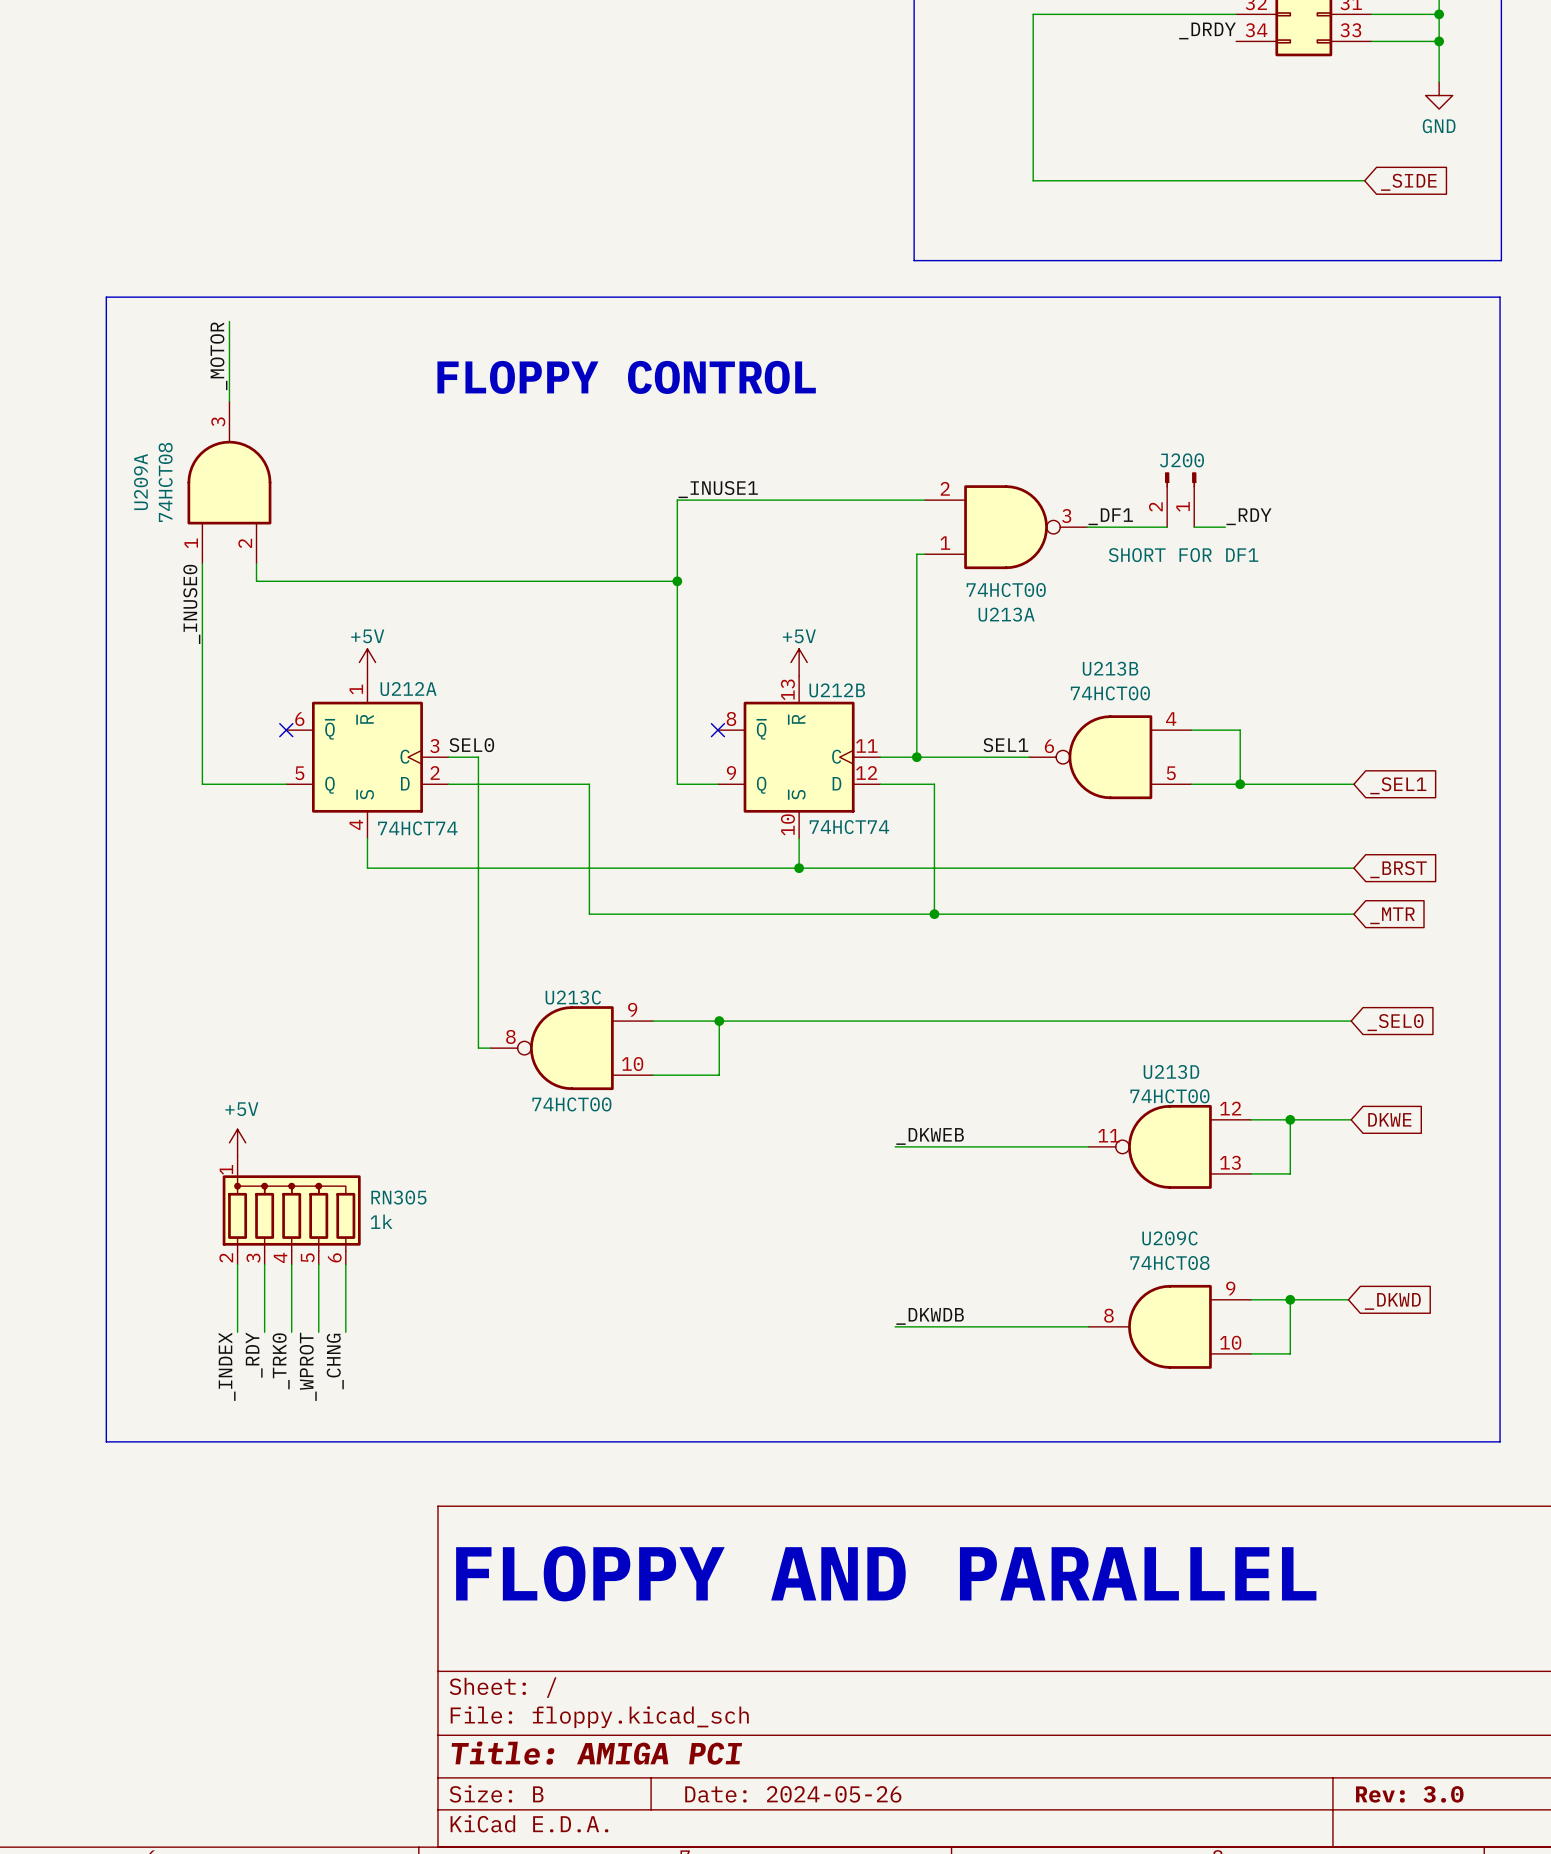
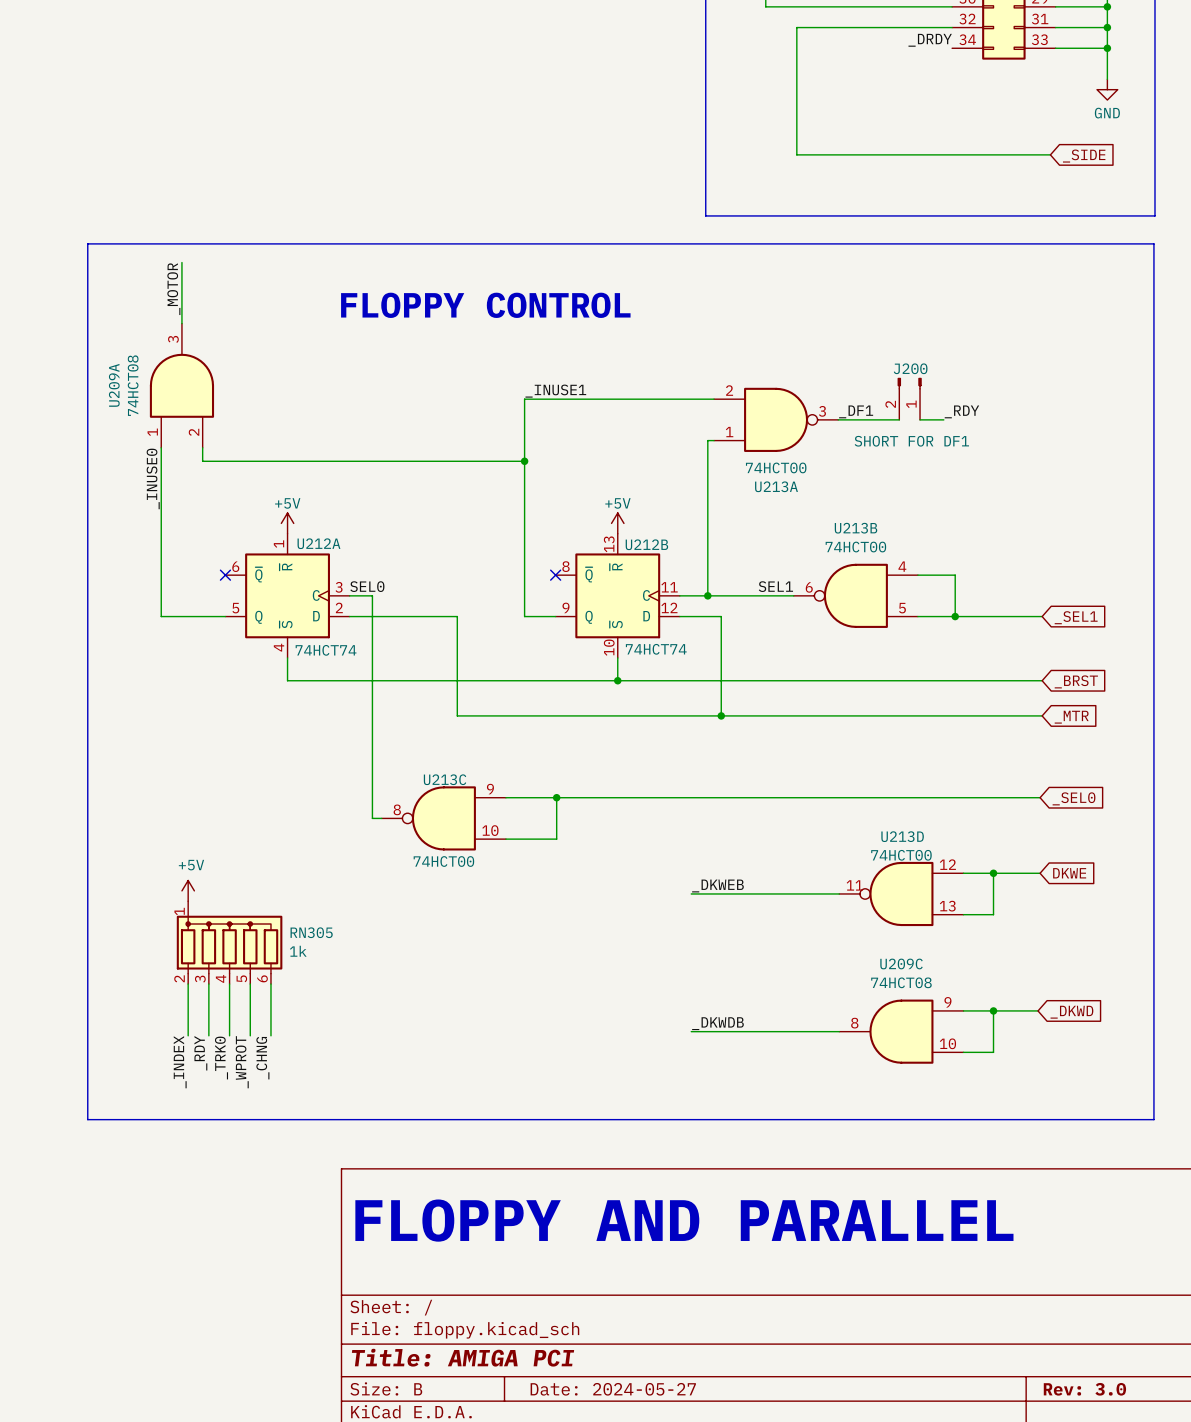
title block: Date: 2024-05-26 (793, 1794) -> Date: 2024-05-27 (613, 1389)

